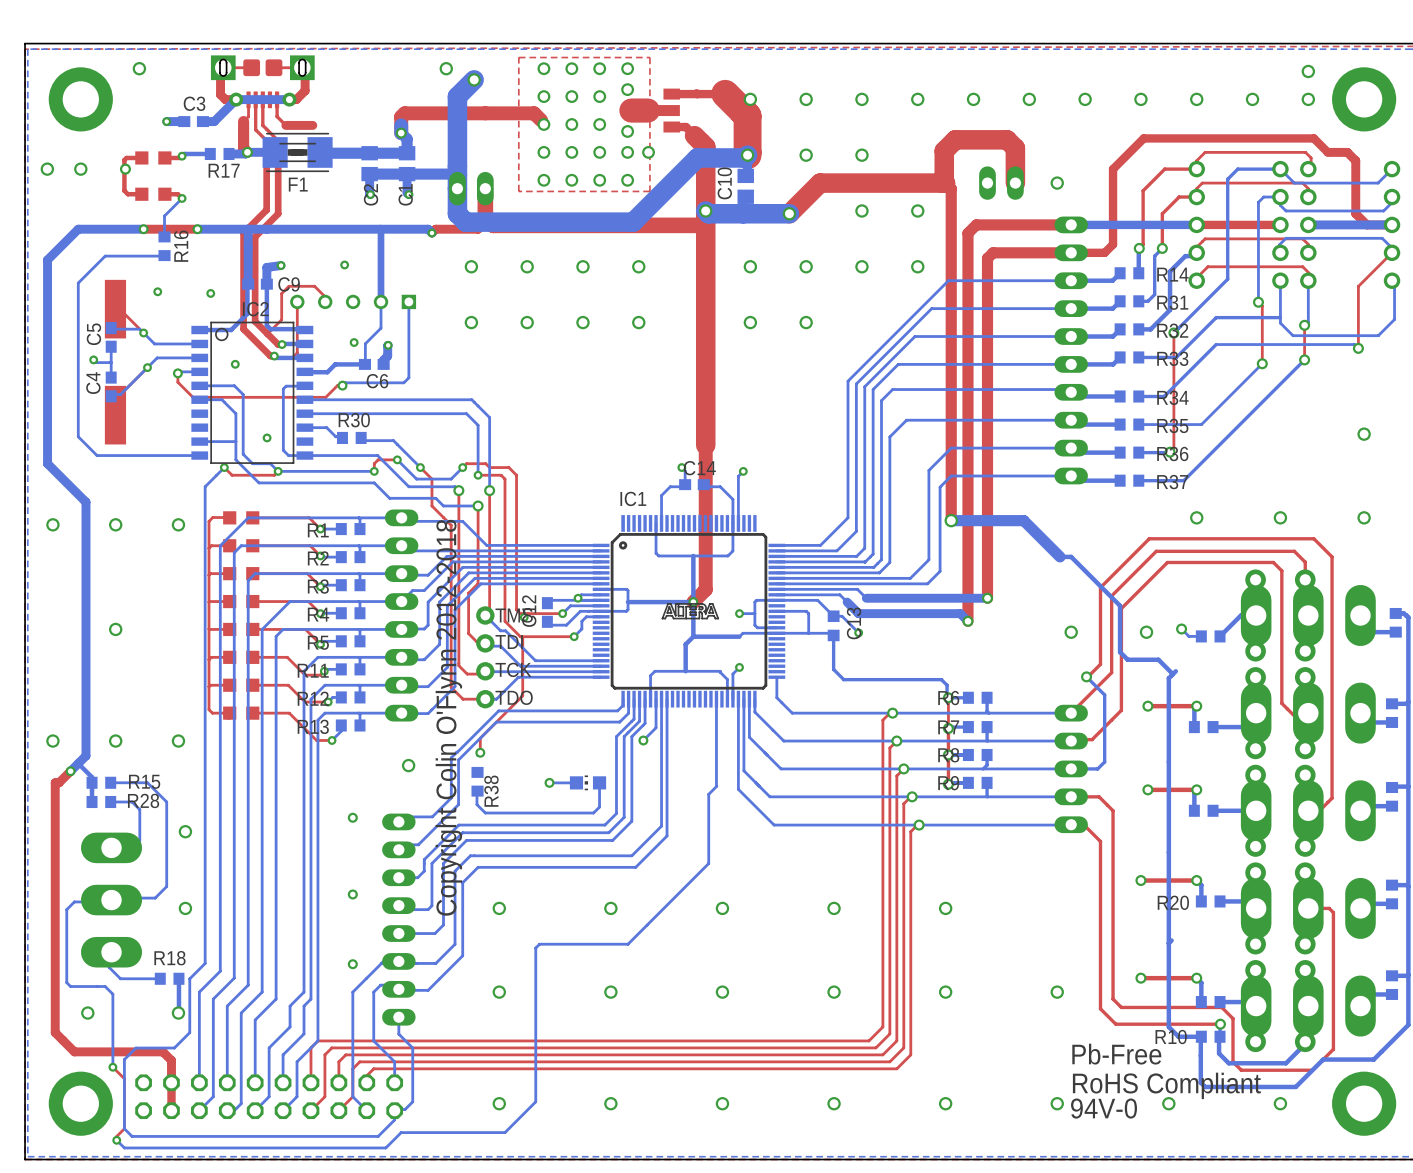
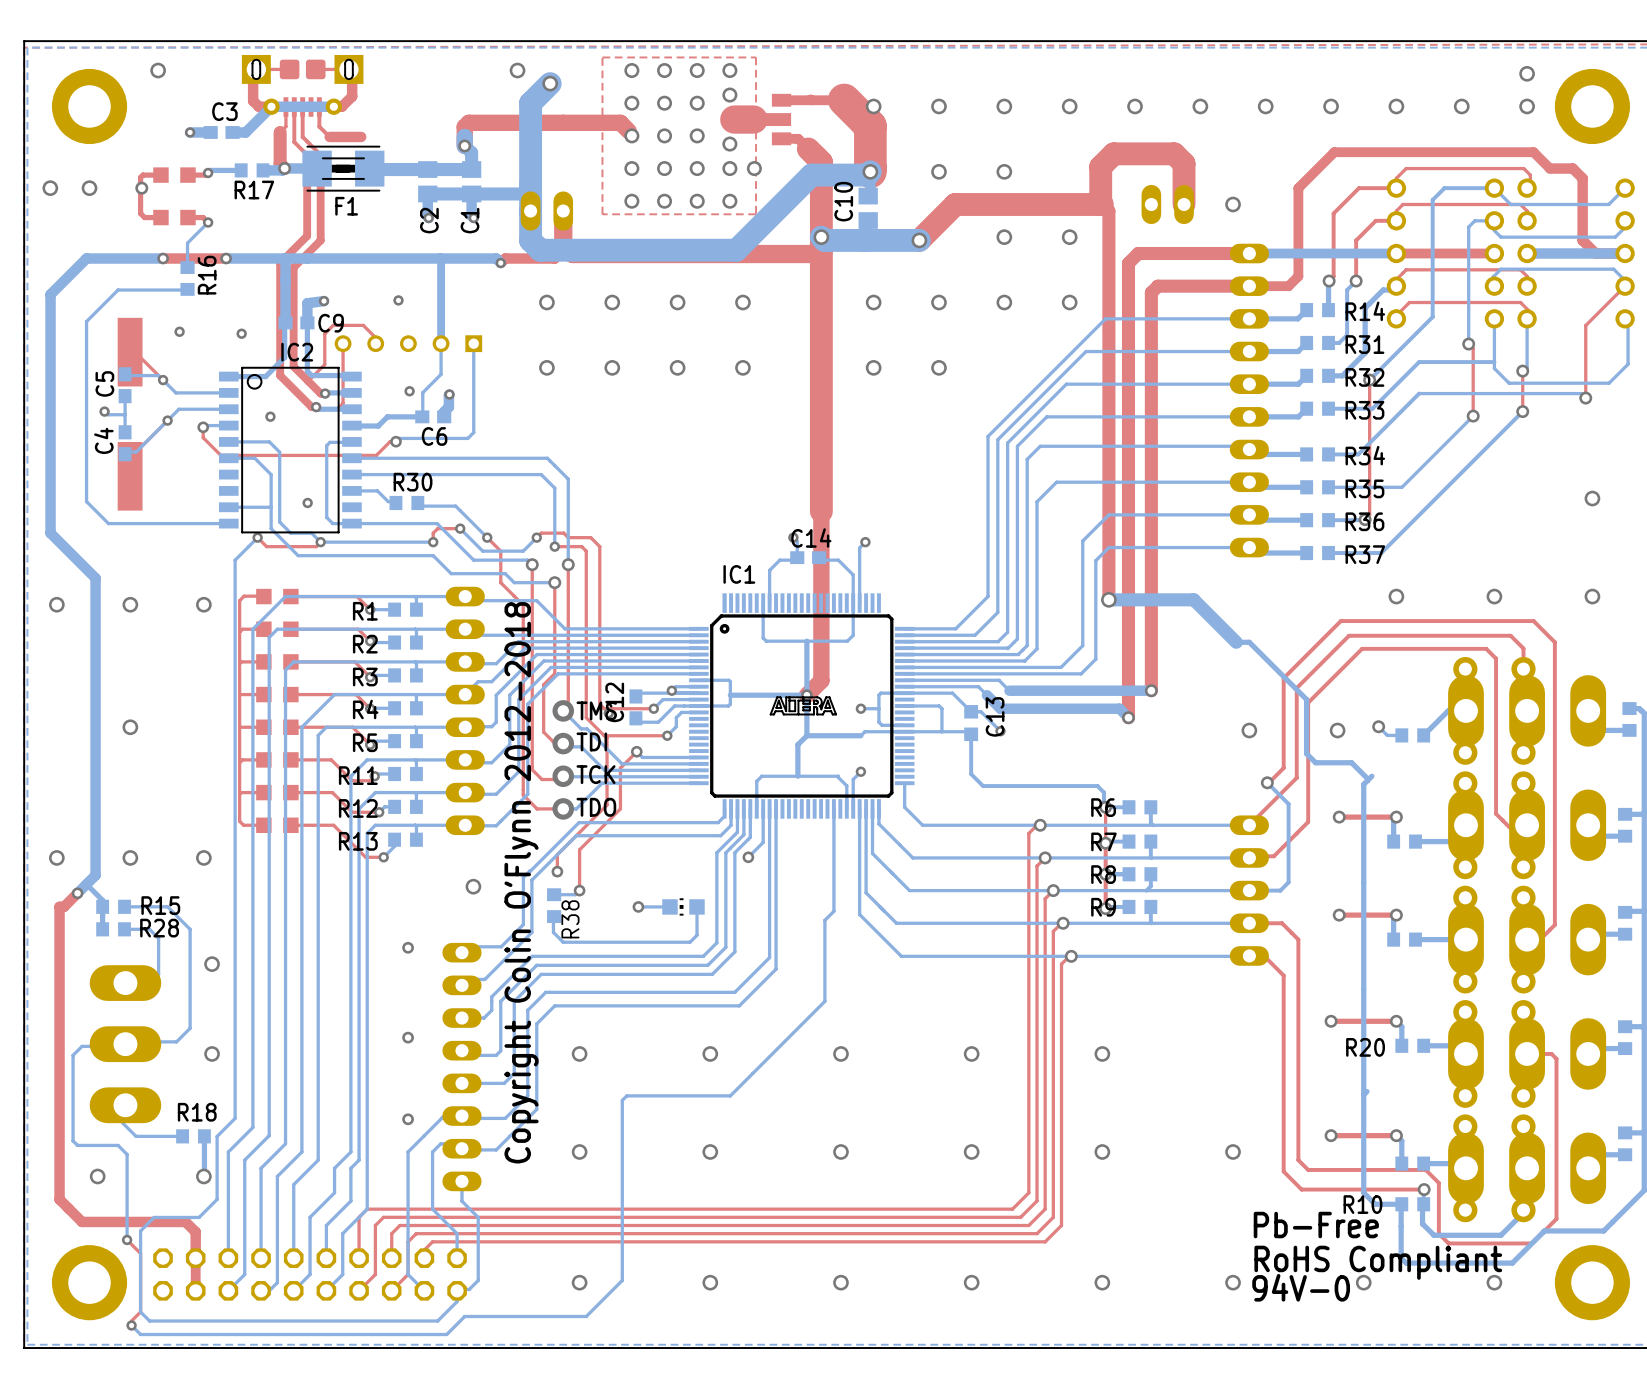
top track: none -> (636, 751) (620, 768) (620, 808) (579, 849) (579, 890)
bottom track: none -> (636, 751) (642, 757) (698, 757)
via: none -> (636, 751)
bottom track: none -> (579, 890) (575, 894) (554, 894)
via: none -> (579, 890)

